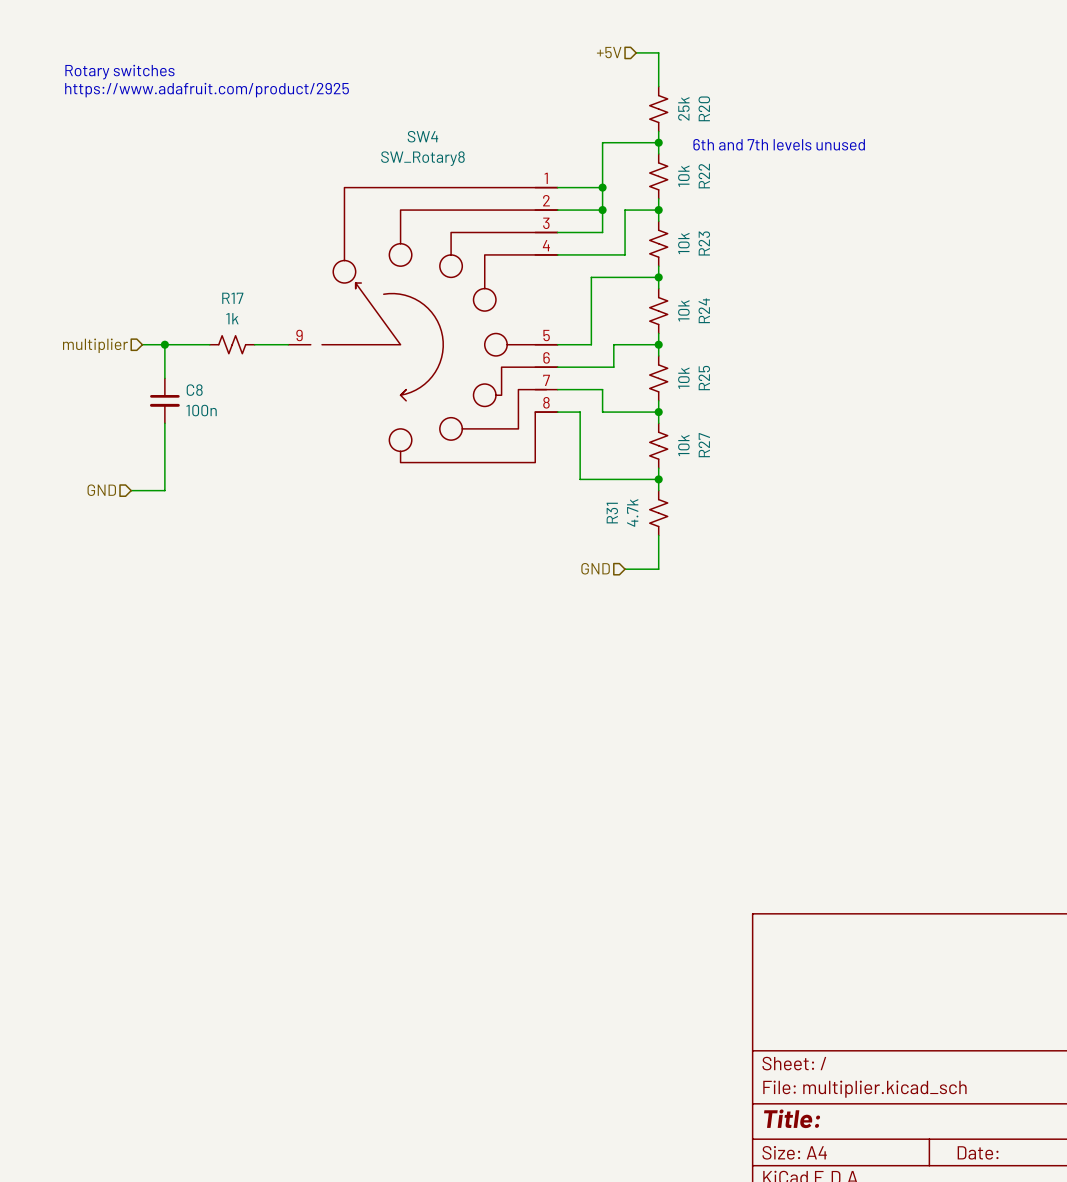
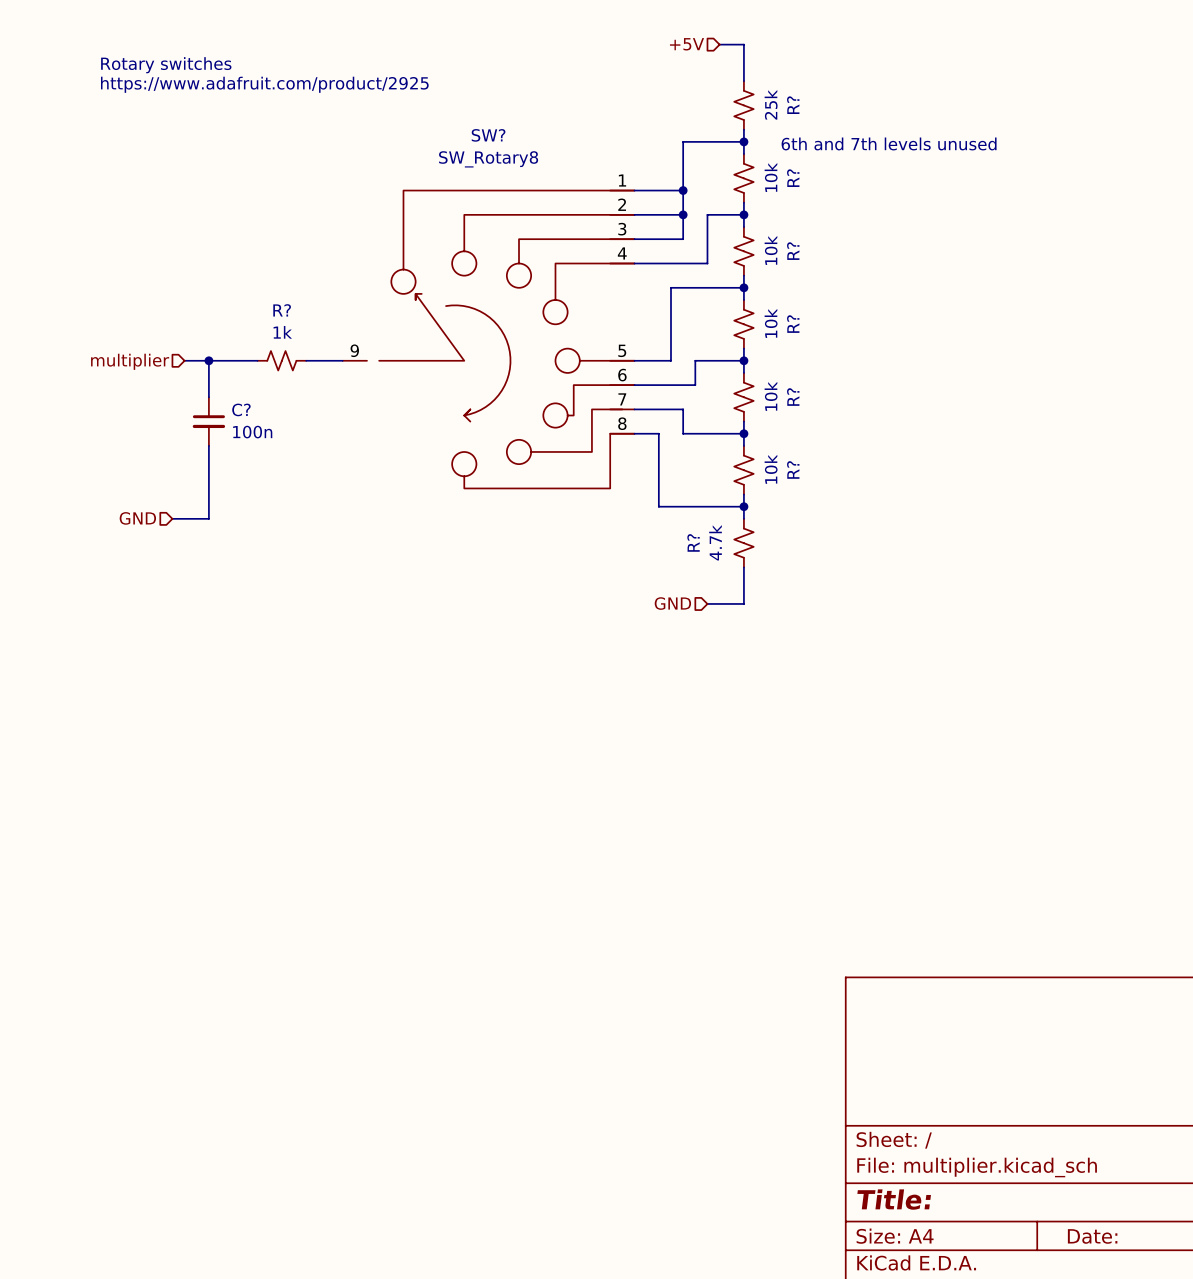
R20 name: R20 (704, 108) -> R? (793, 105)
SW4 name: SW4 (422, 136) -> SW? (488, 135)
R22 name: R22 (704, 176) -> R? (793, 178)
R23 name: R23 (704, 243) -> R? (793, 251)
R17 name: R17 (232, 298) -> R? (282, 310)
R24 name: R24 (704, 310) -> R? (793, 324)
R25 name: R25 (704, 378) -> R? (793, 397)
C8 name: C8 (194, 390) -> C? (241, 409)
R27 name: R27 (704, 445) -> R? (793, 469)
R31 name: R31 (612, 513) -> R? (693, 542)

